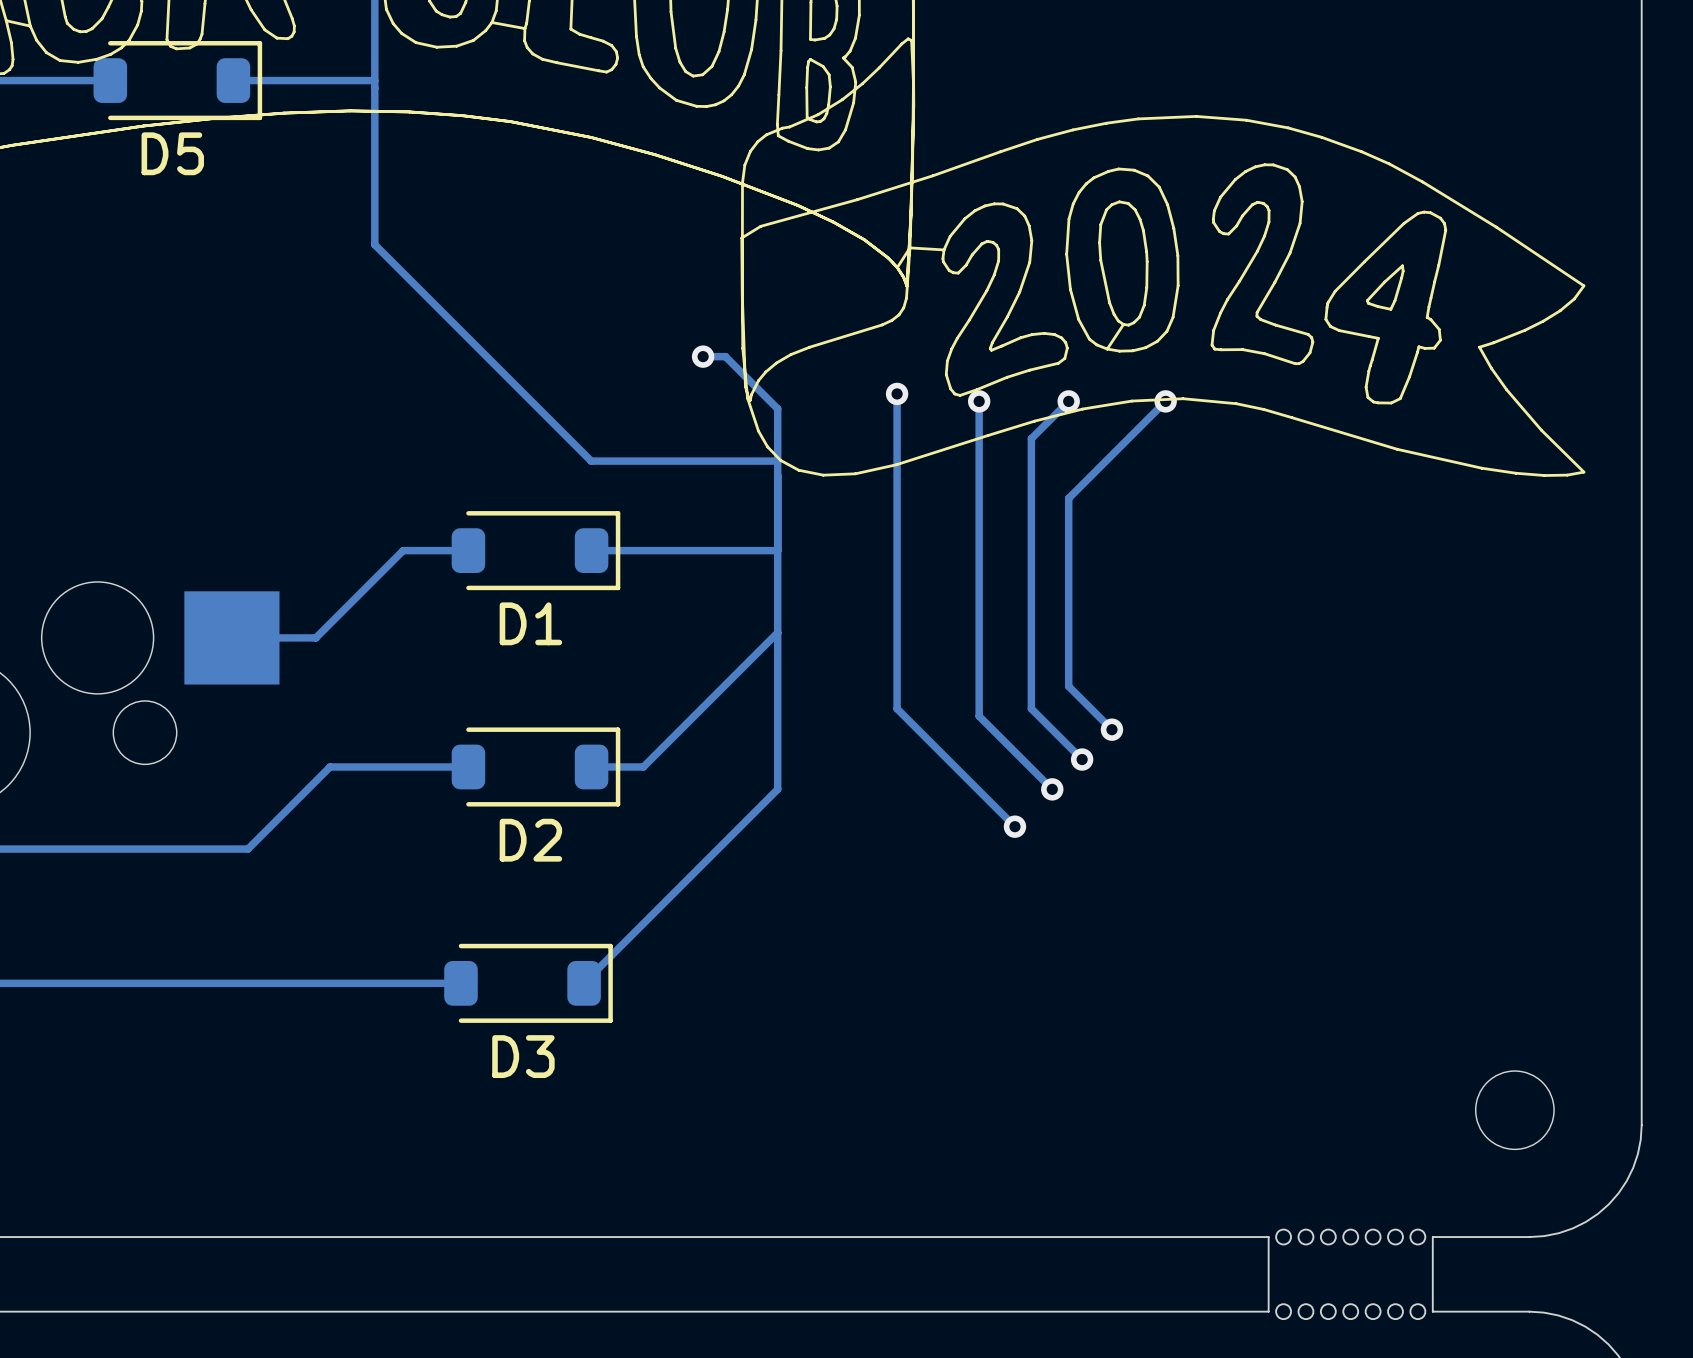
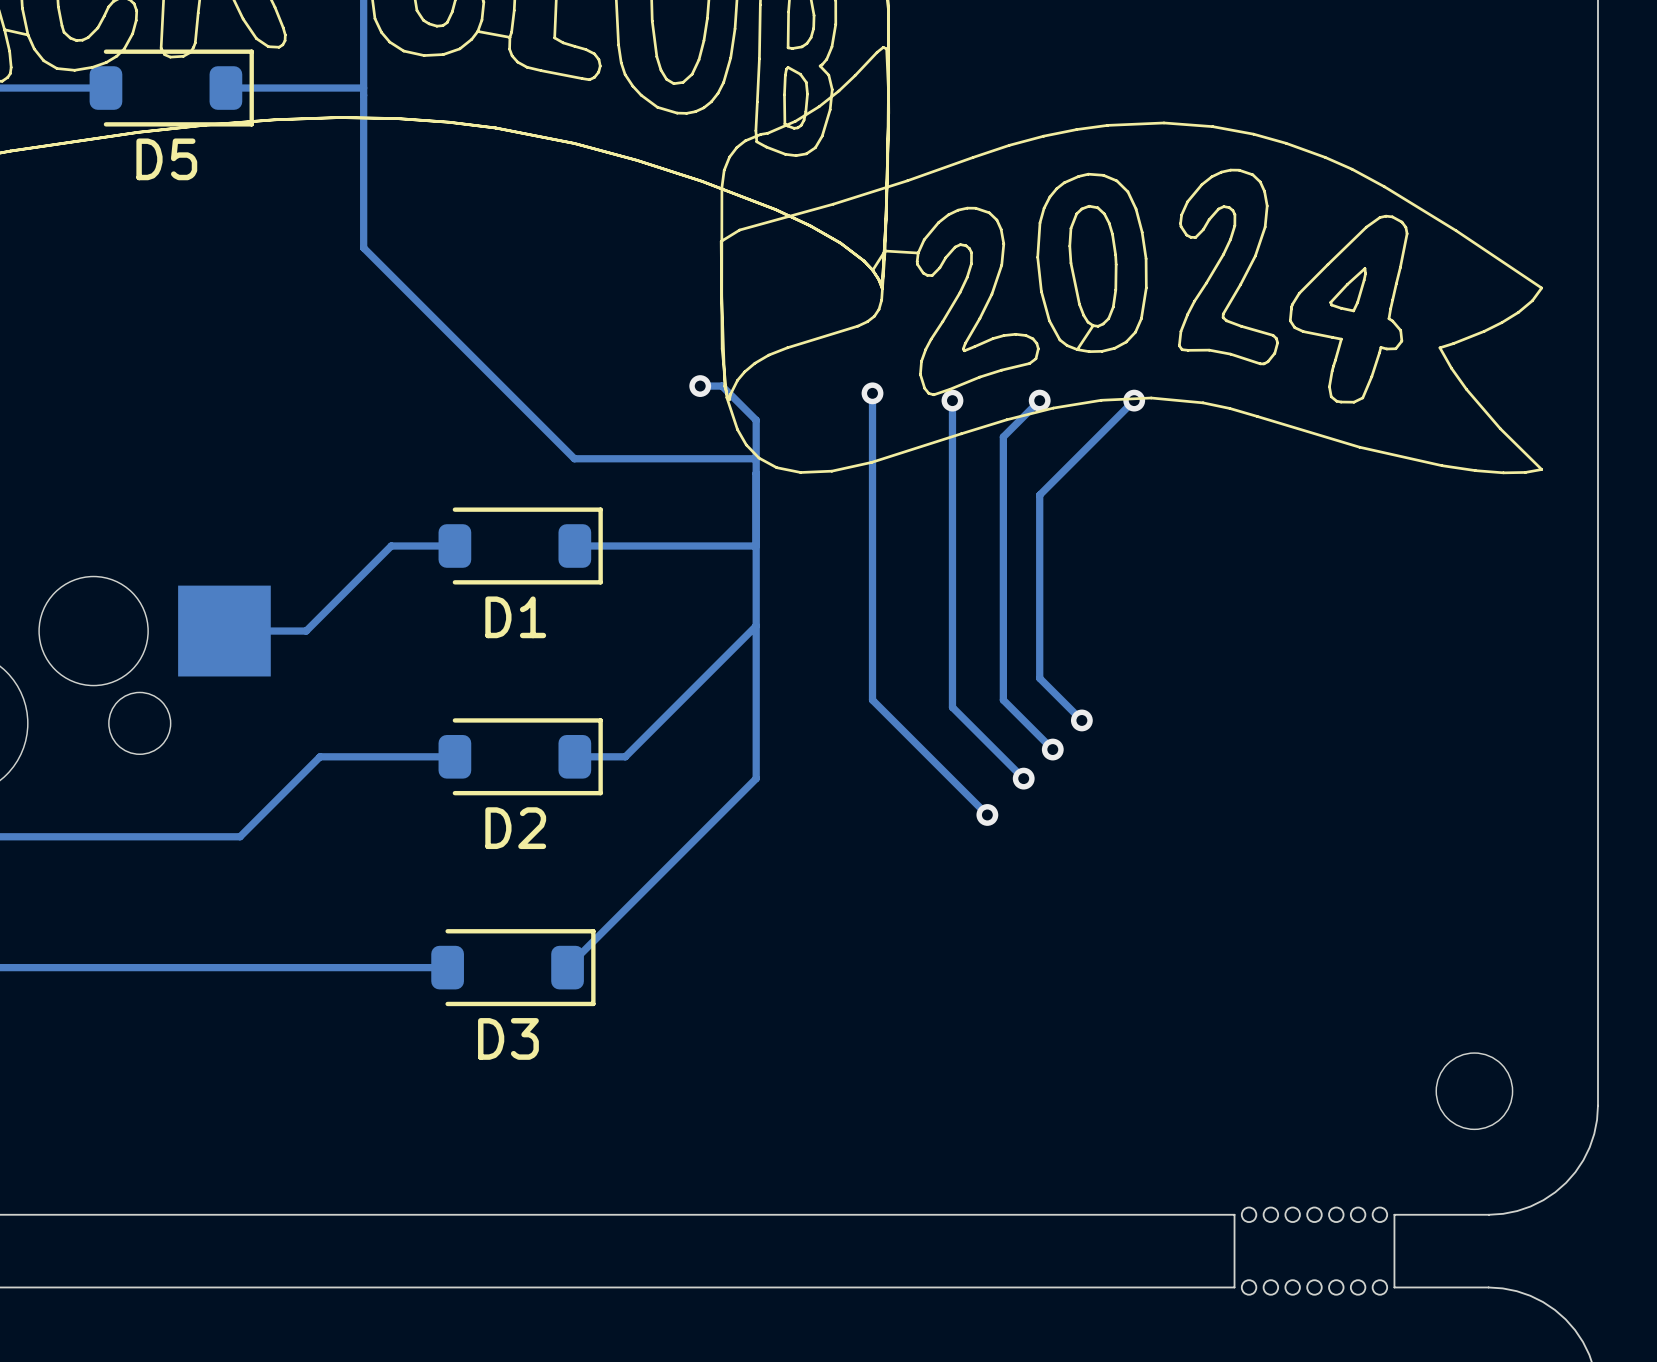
track: (703, 356) (725, 356) (777, 408) (777, 421) -> (700, 386) (722, 386) (756, 420)
via position: (703, 356) -> (700, 386)

